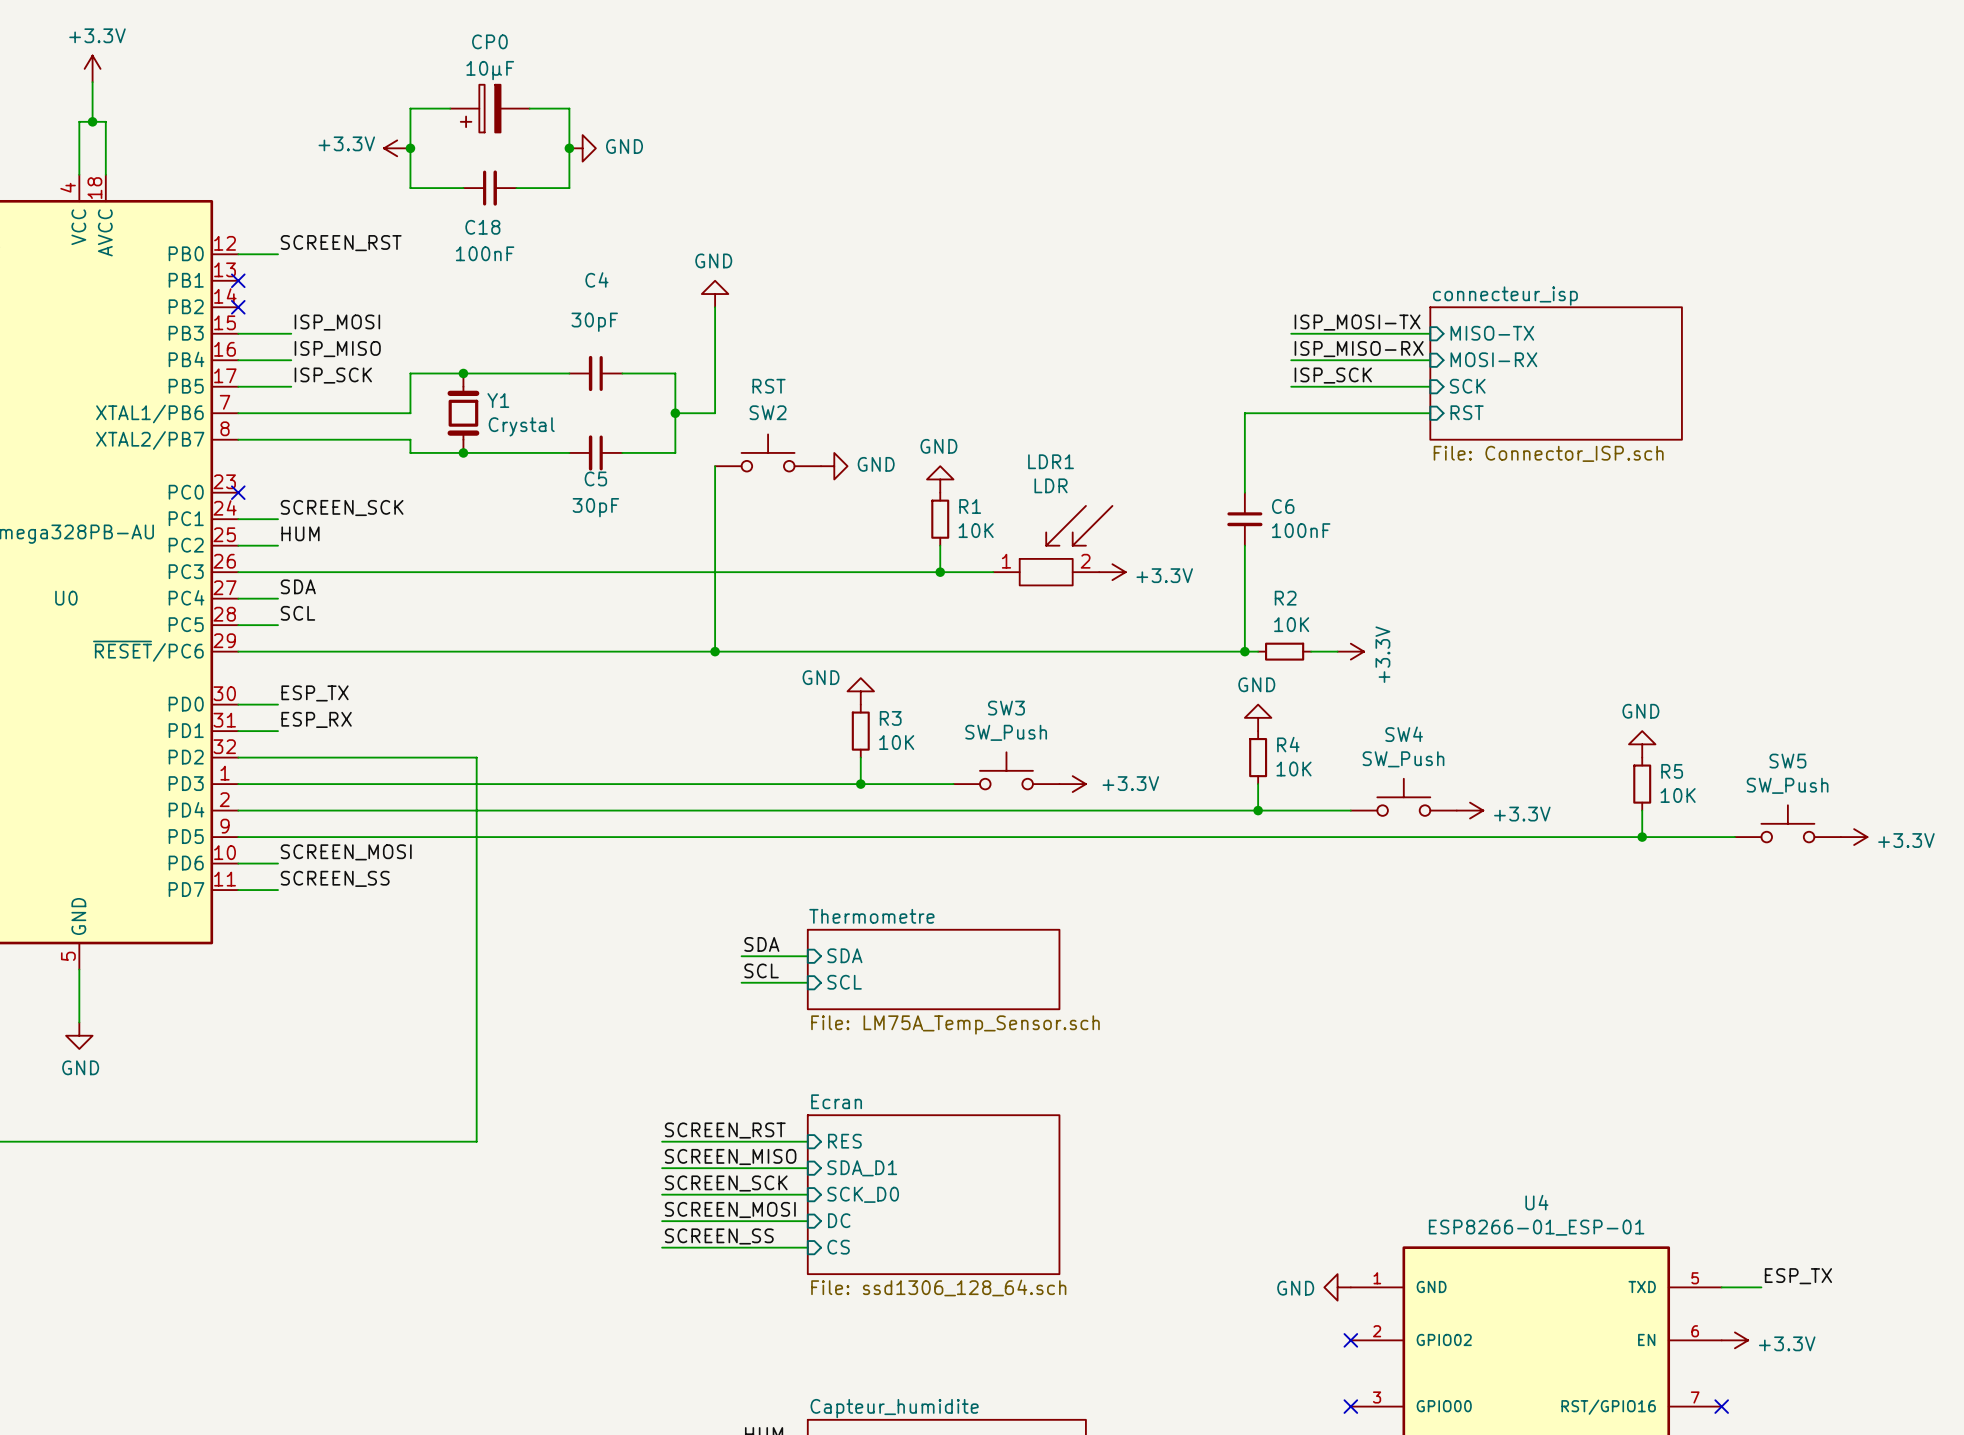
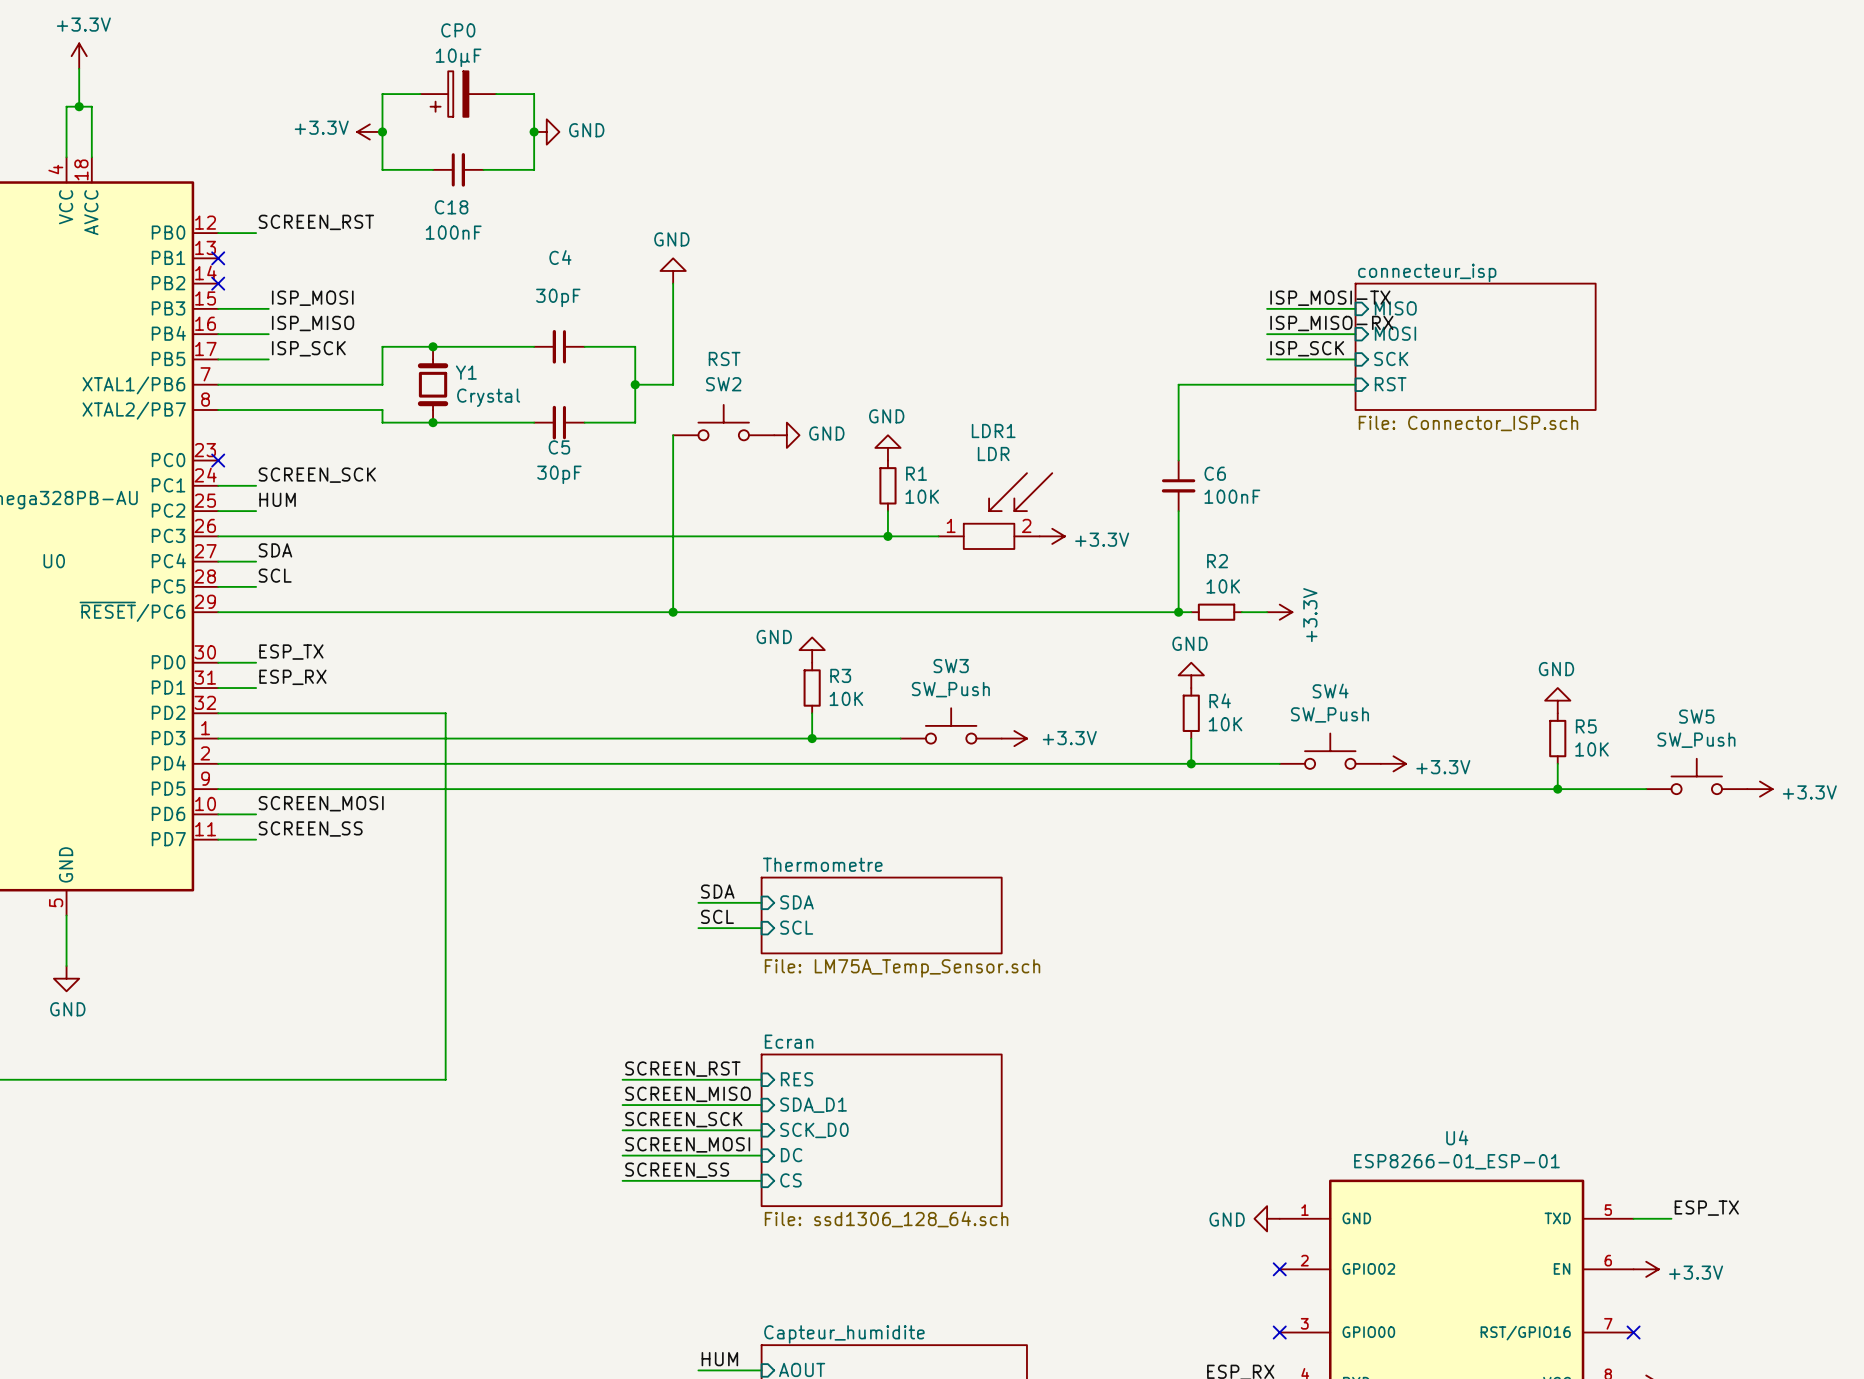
label position: ISP_MOSI-TX (1357, 322) -> ISP_MOSI-TX (1330, 298)
wire: (1291, 333) (1337, 333) -> none
sheet pin: MISO-TX (1492, 333) -> MISO (1395, 308)
label position: ISP_MISO-RX (1359, 349) -> ISP_MISO-RX (1331, 323)
sheet pin: MOSI-RX (1493, 359) -> MOSI (1395, 333)
wire: (1291, 360) (1337, 360) -> none
label position: ISP_SCK (1333, 375) -> ISP_SCK (1307, 348)
wire: (1291, 386) (1337, 386) -> none

